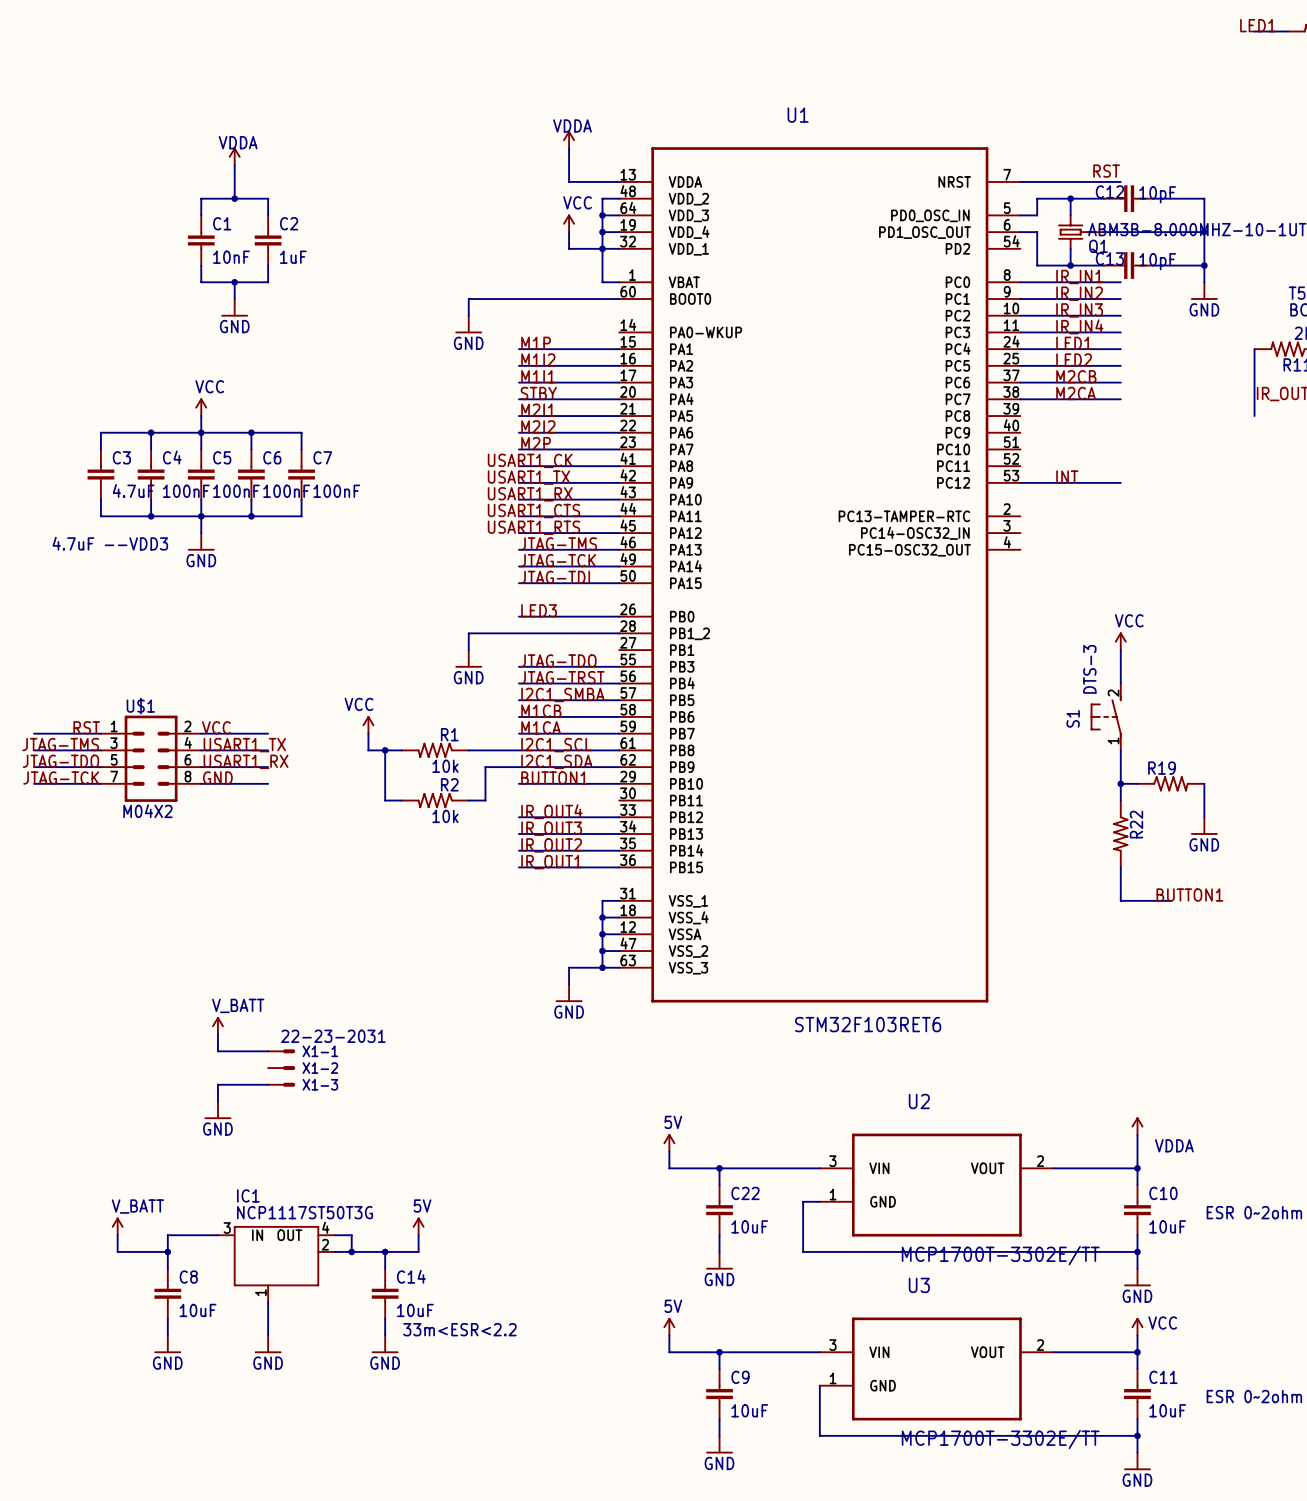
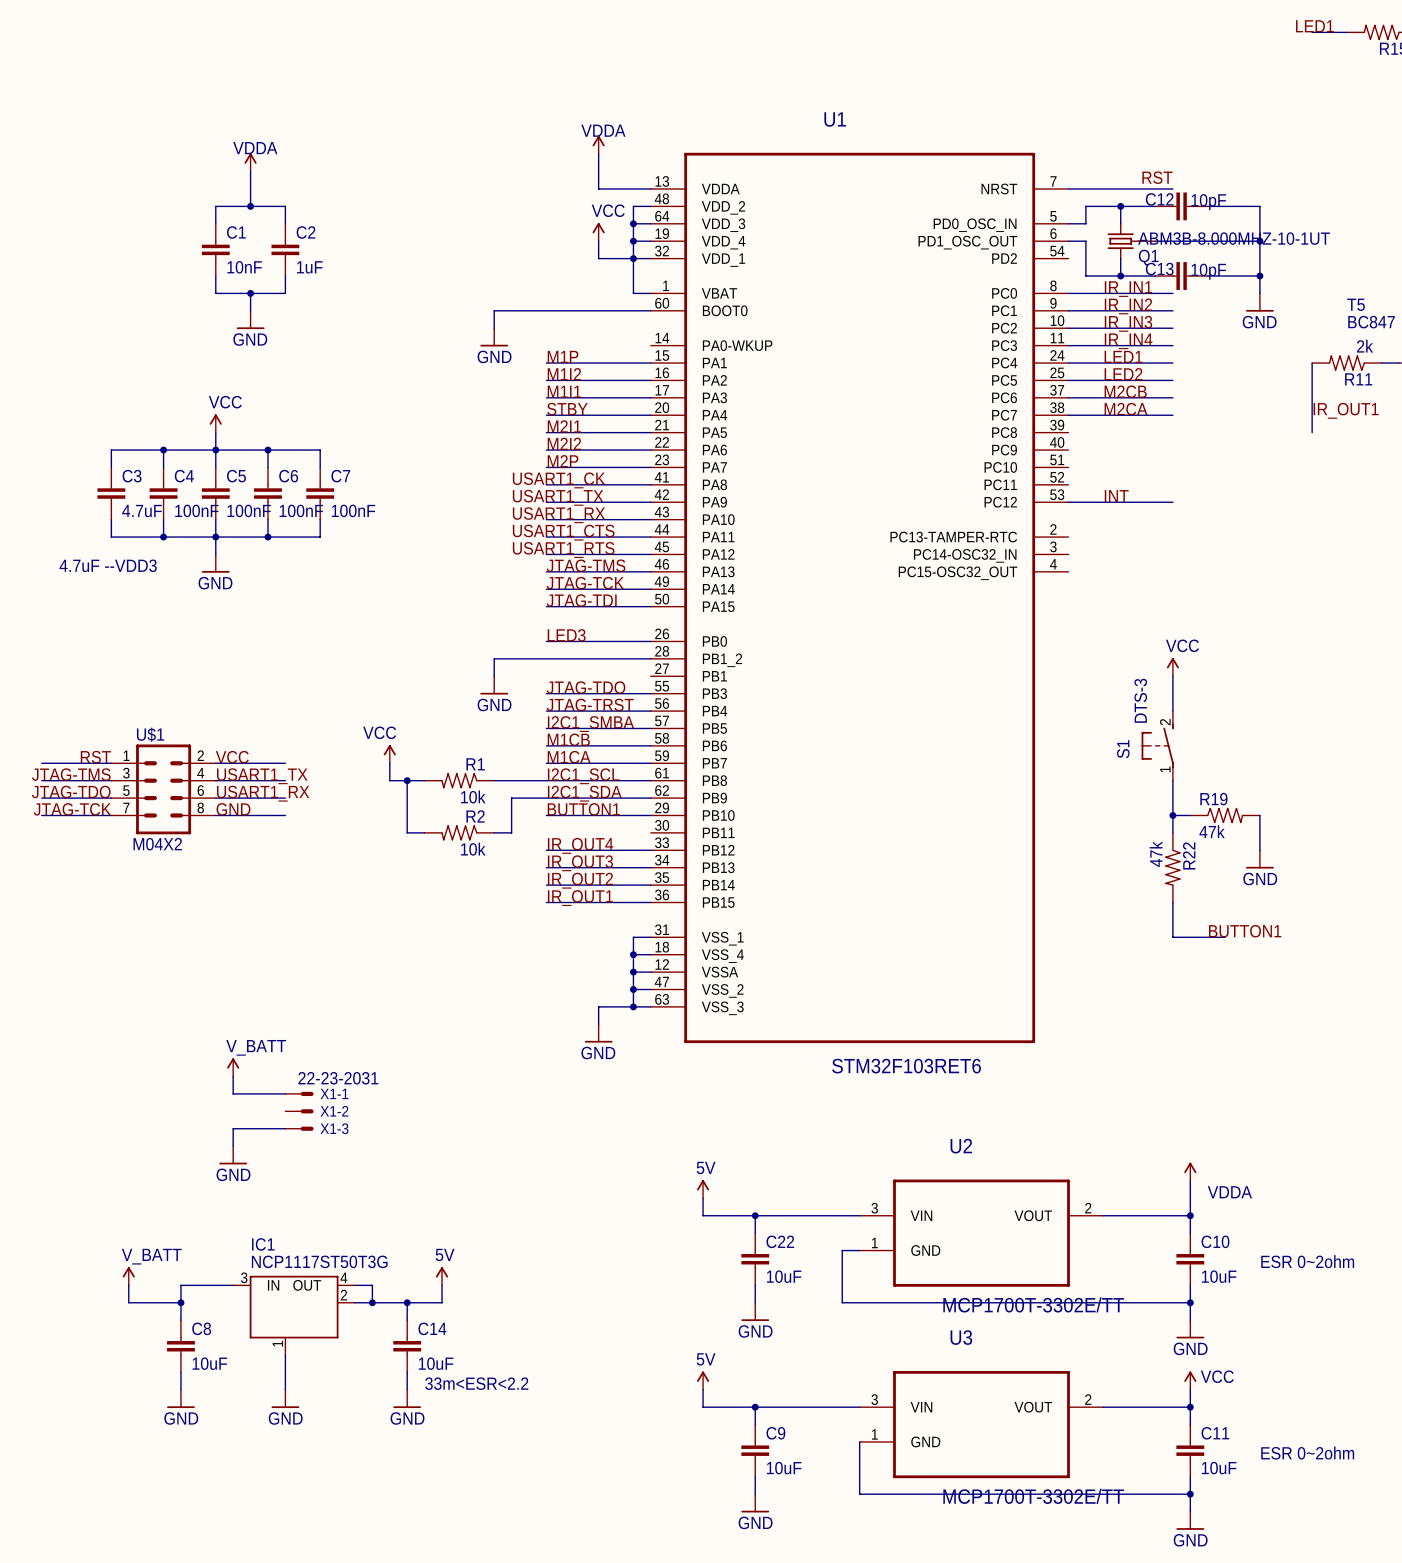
R19 value: none -> 47k (1212, 831)
R22 value: none -> 47k (1156, 854)

